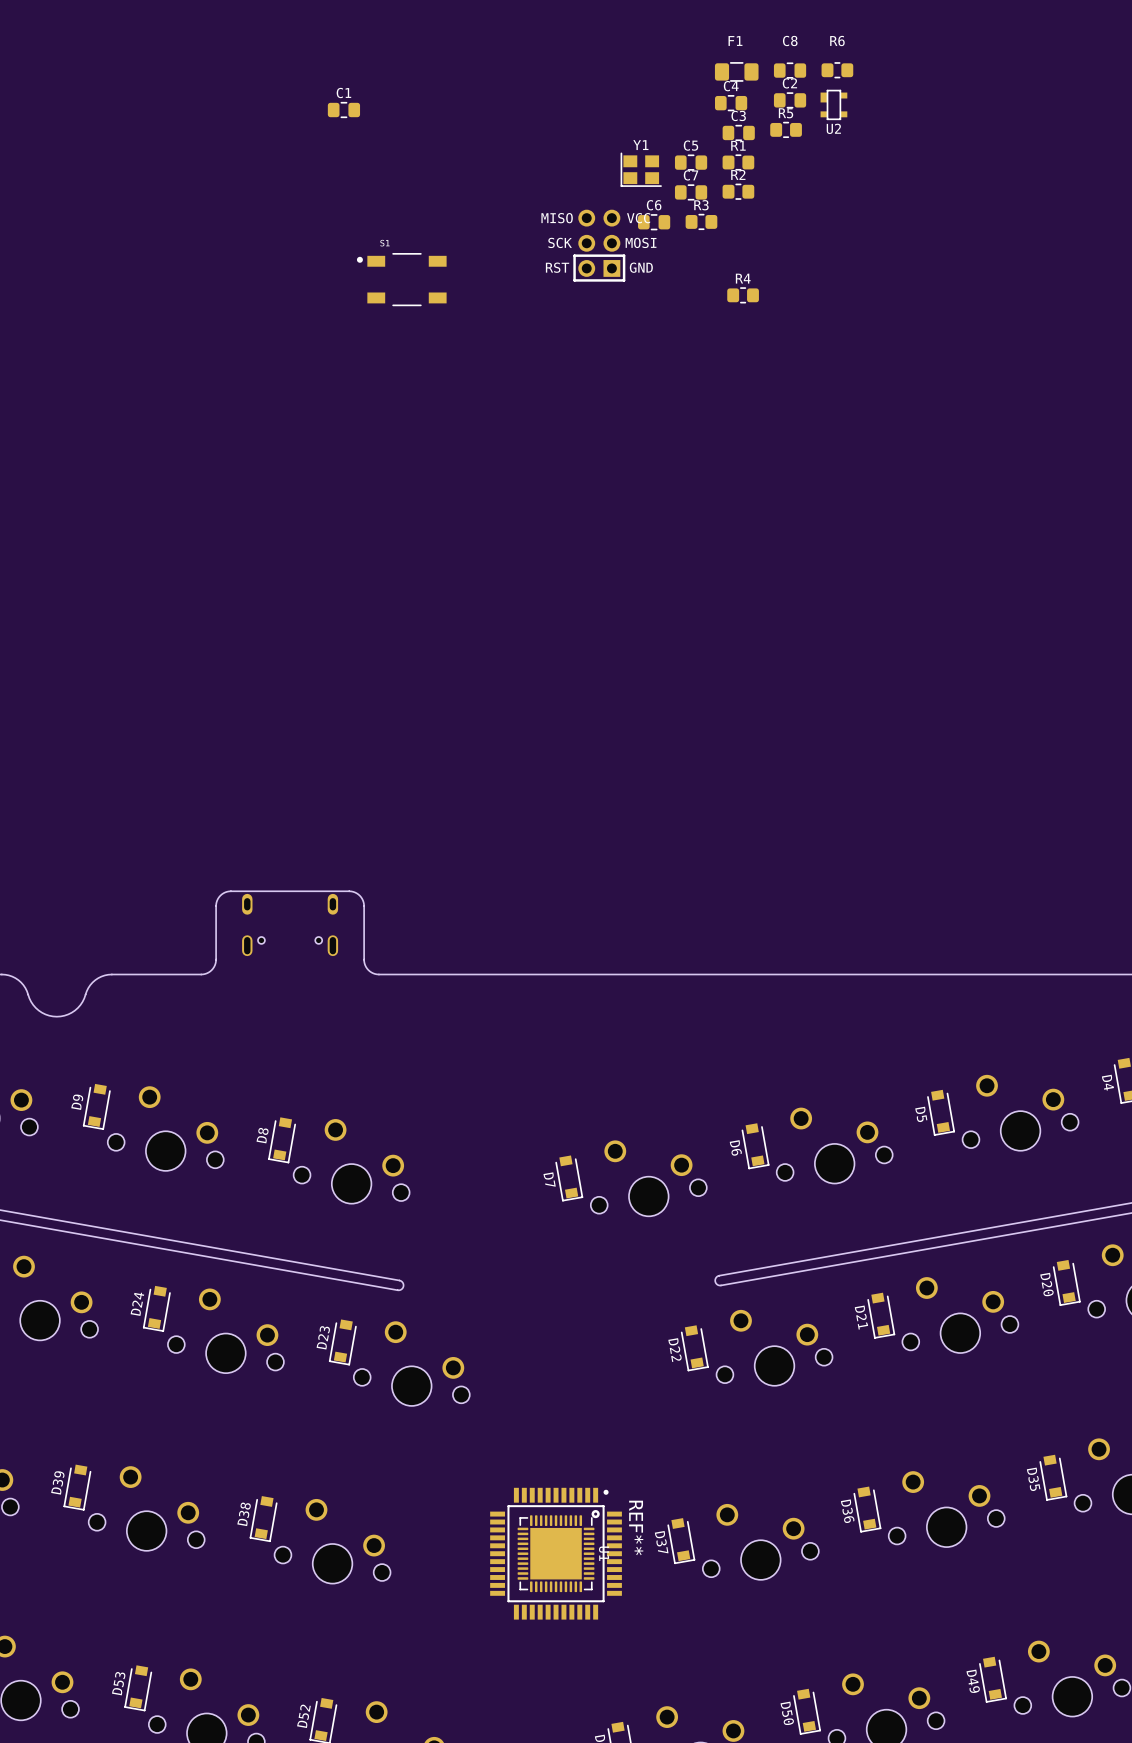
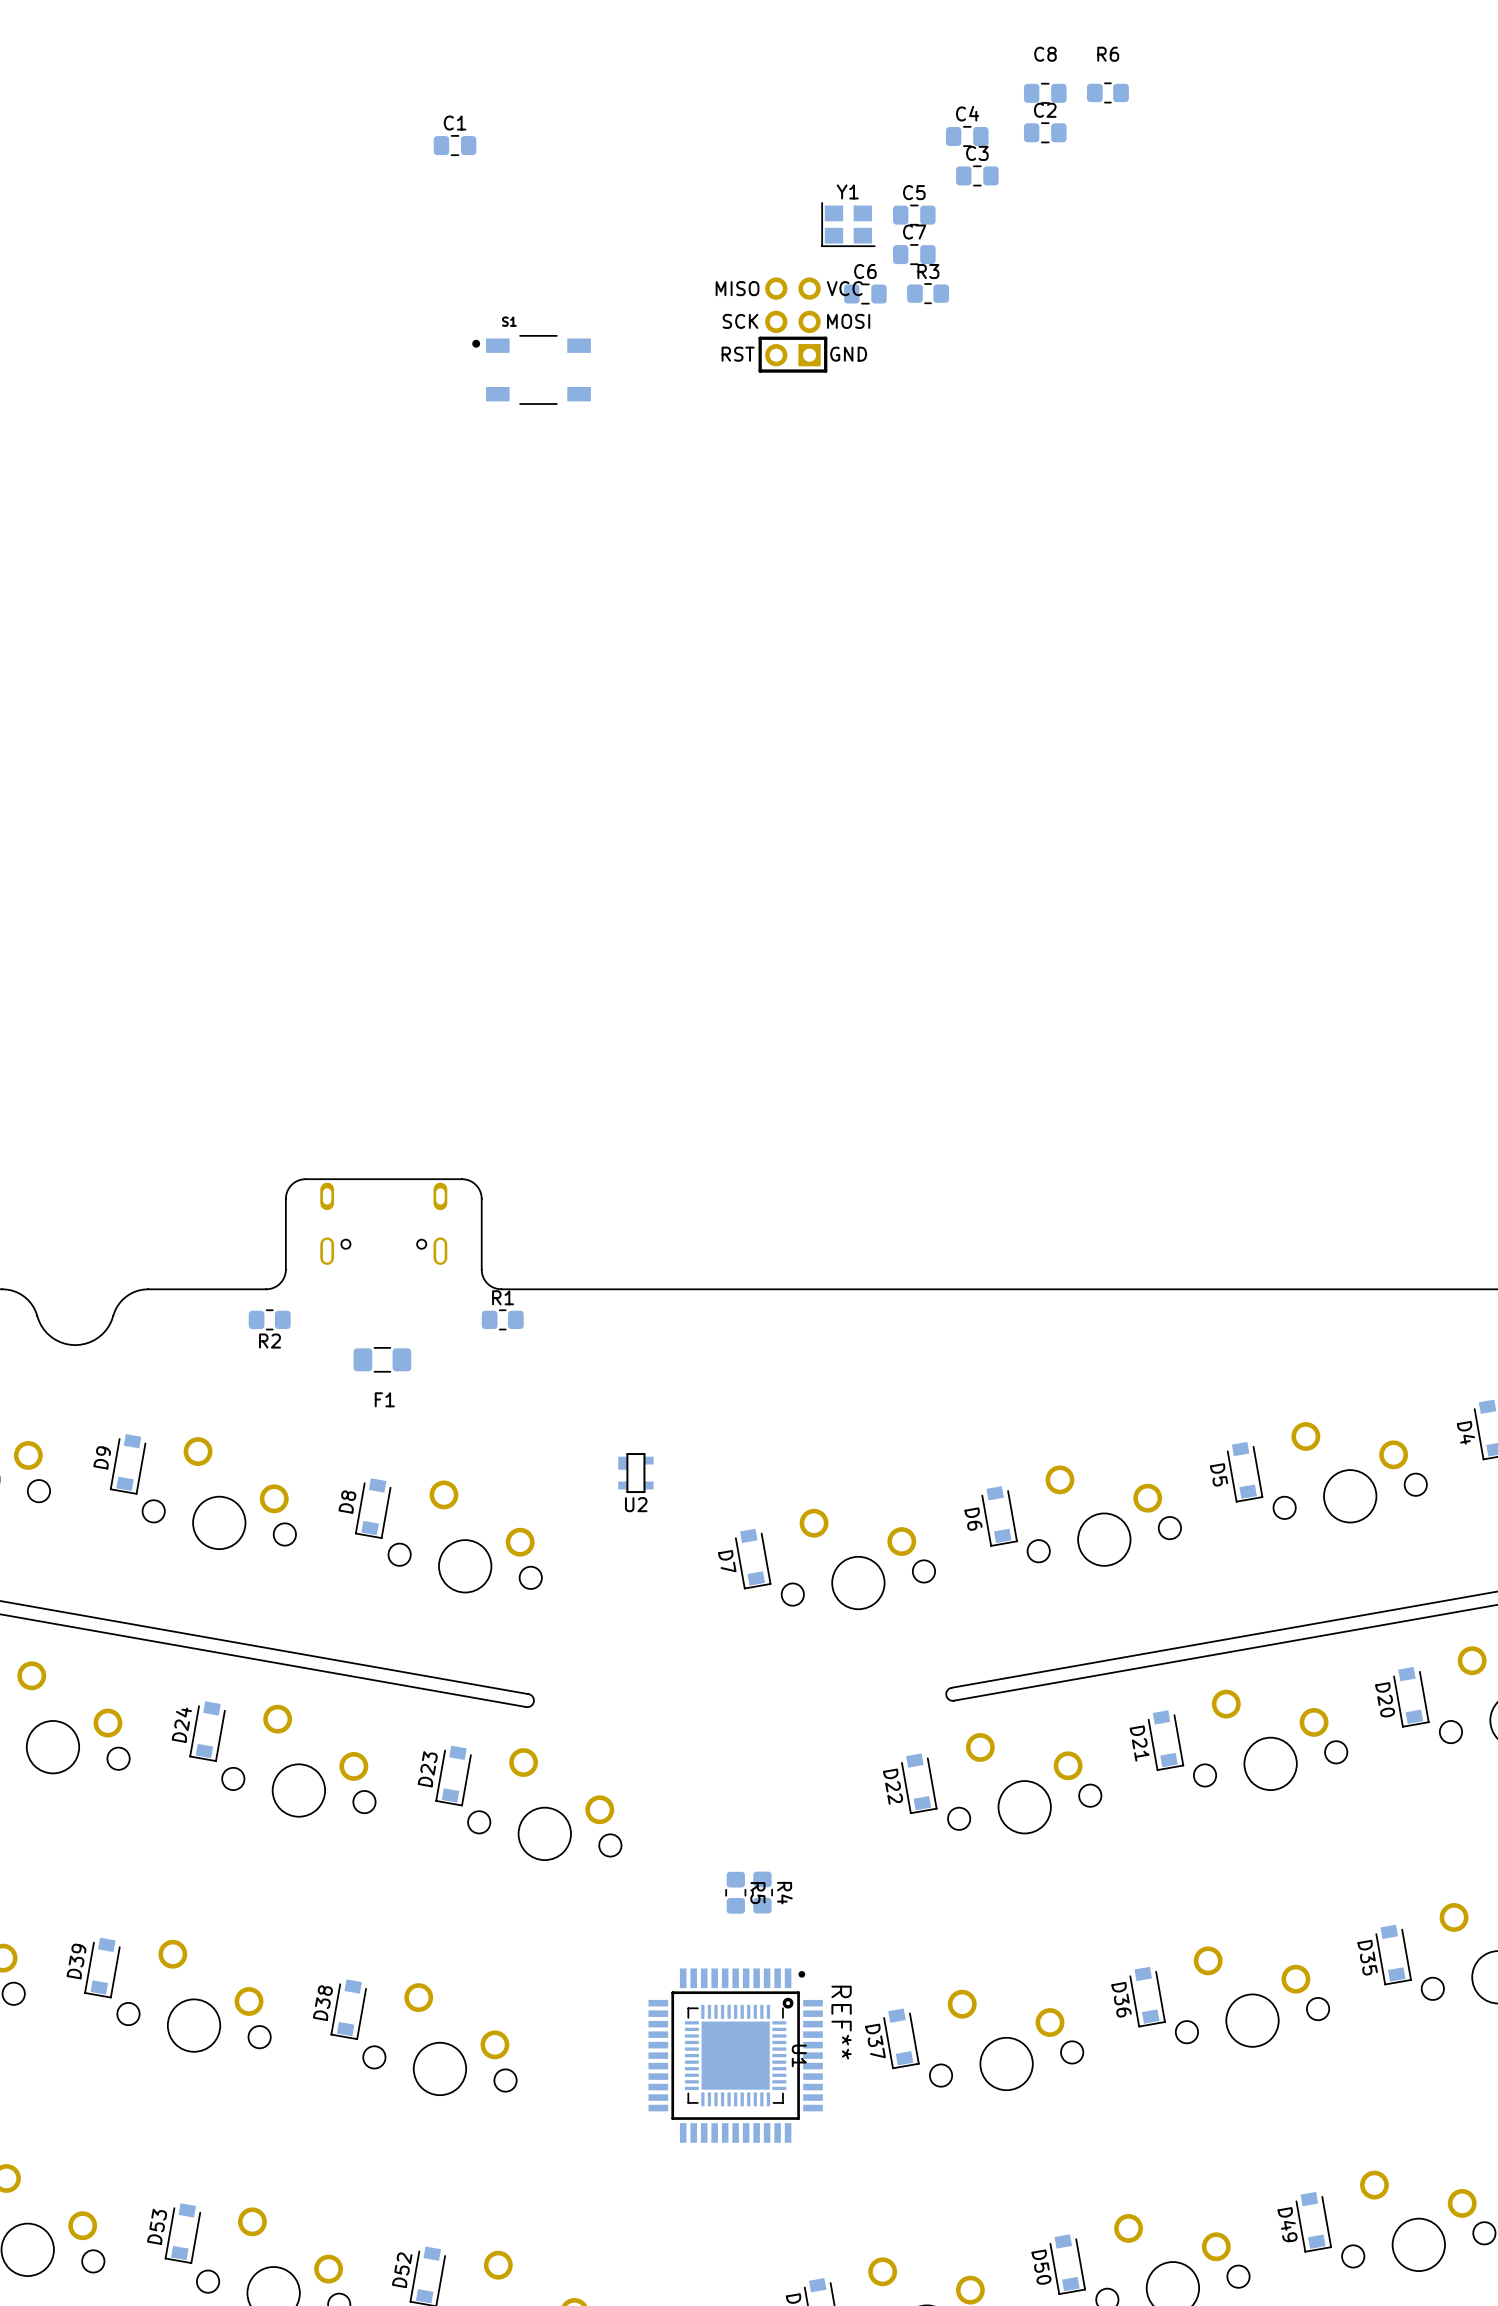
F1 name position: F1 (735, 40) -> F1 (384, 1399)
F1 position: (736, 71) -> (382, 1359)
U2 position: (833, 104) -> (635, 1473)
R5 rotation: 0° (786, 129) -> 90° clockwise (735, 1892)
R5 position: (786, 129) -> (735, 1892)
R1 position: (738, 162) -> (502, 1319)
R2 name position: R2 (738, 174) -> R2 (270, 1341)
R2 position: (738, 191) -> (269, 1319)
R4 rotation: 0° (743, 295) -> 90° clockwise (762, 1892)
R4 position: (743, 295) -> (762, 1892)

